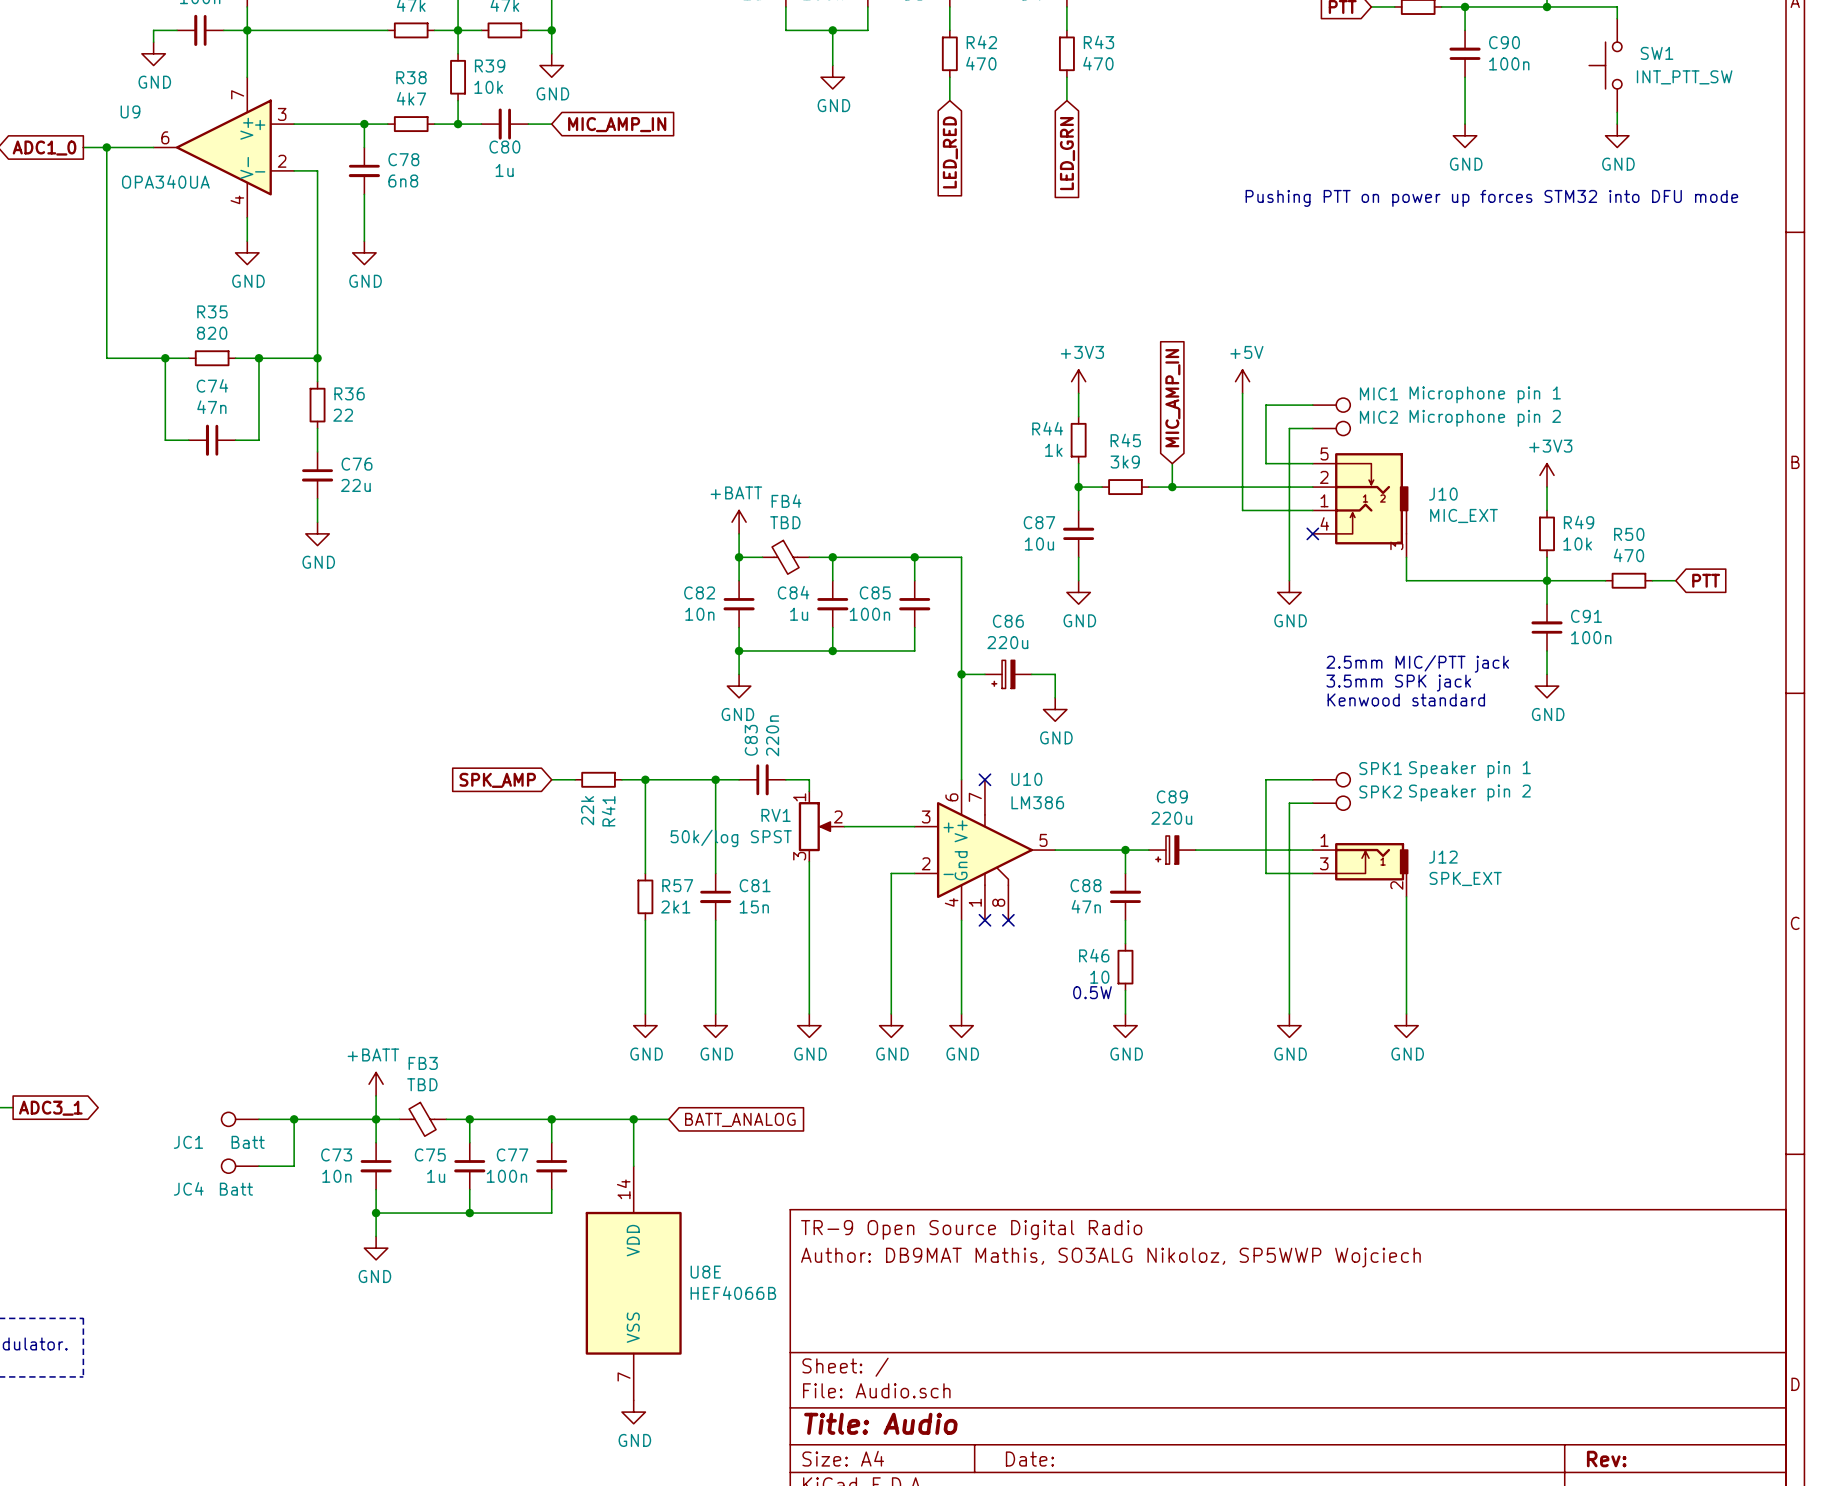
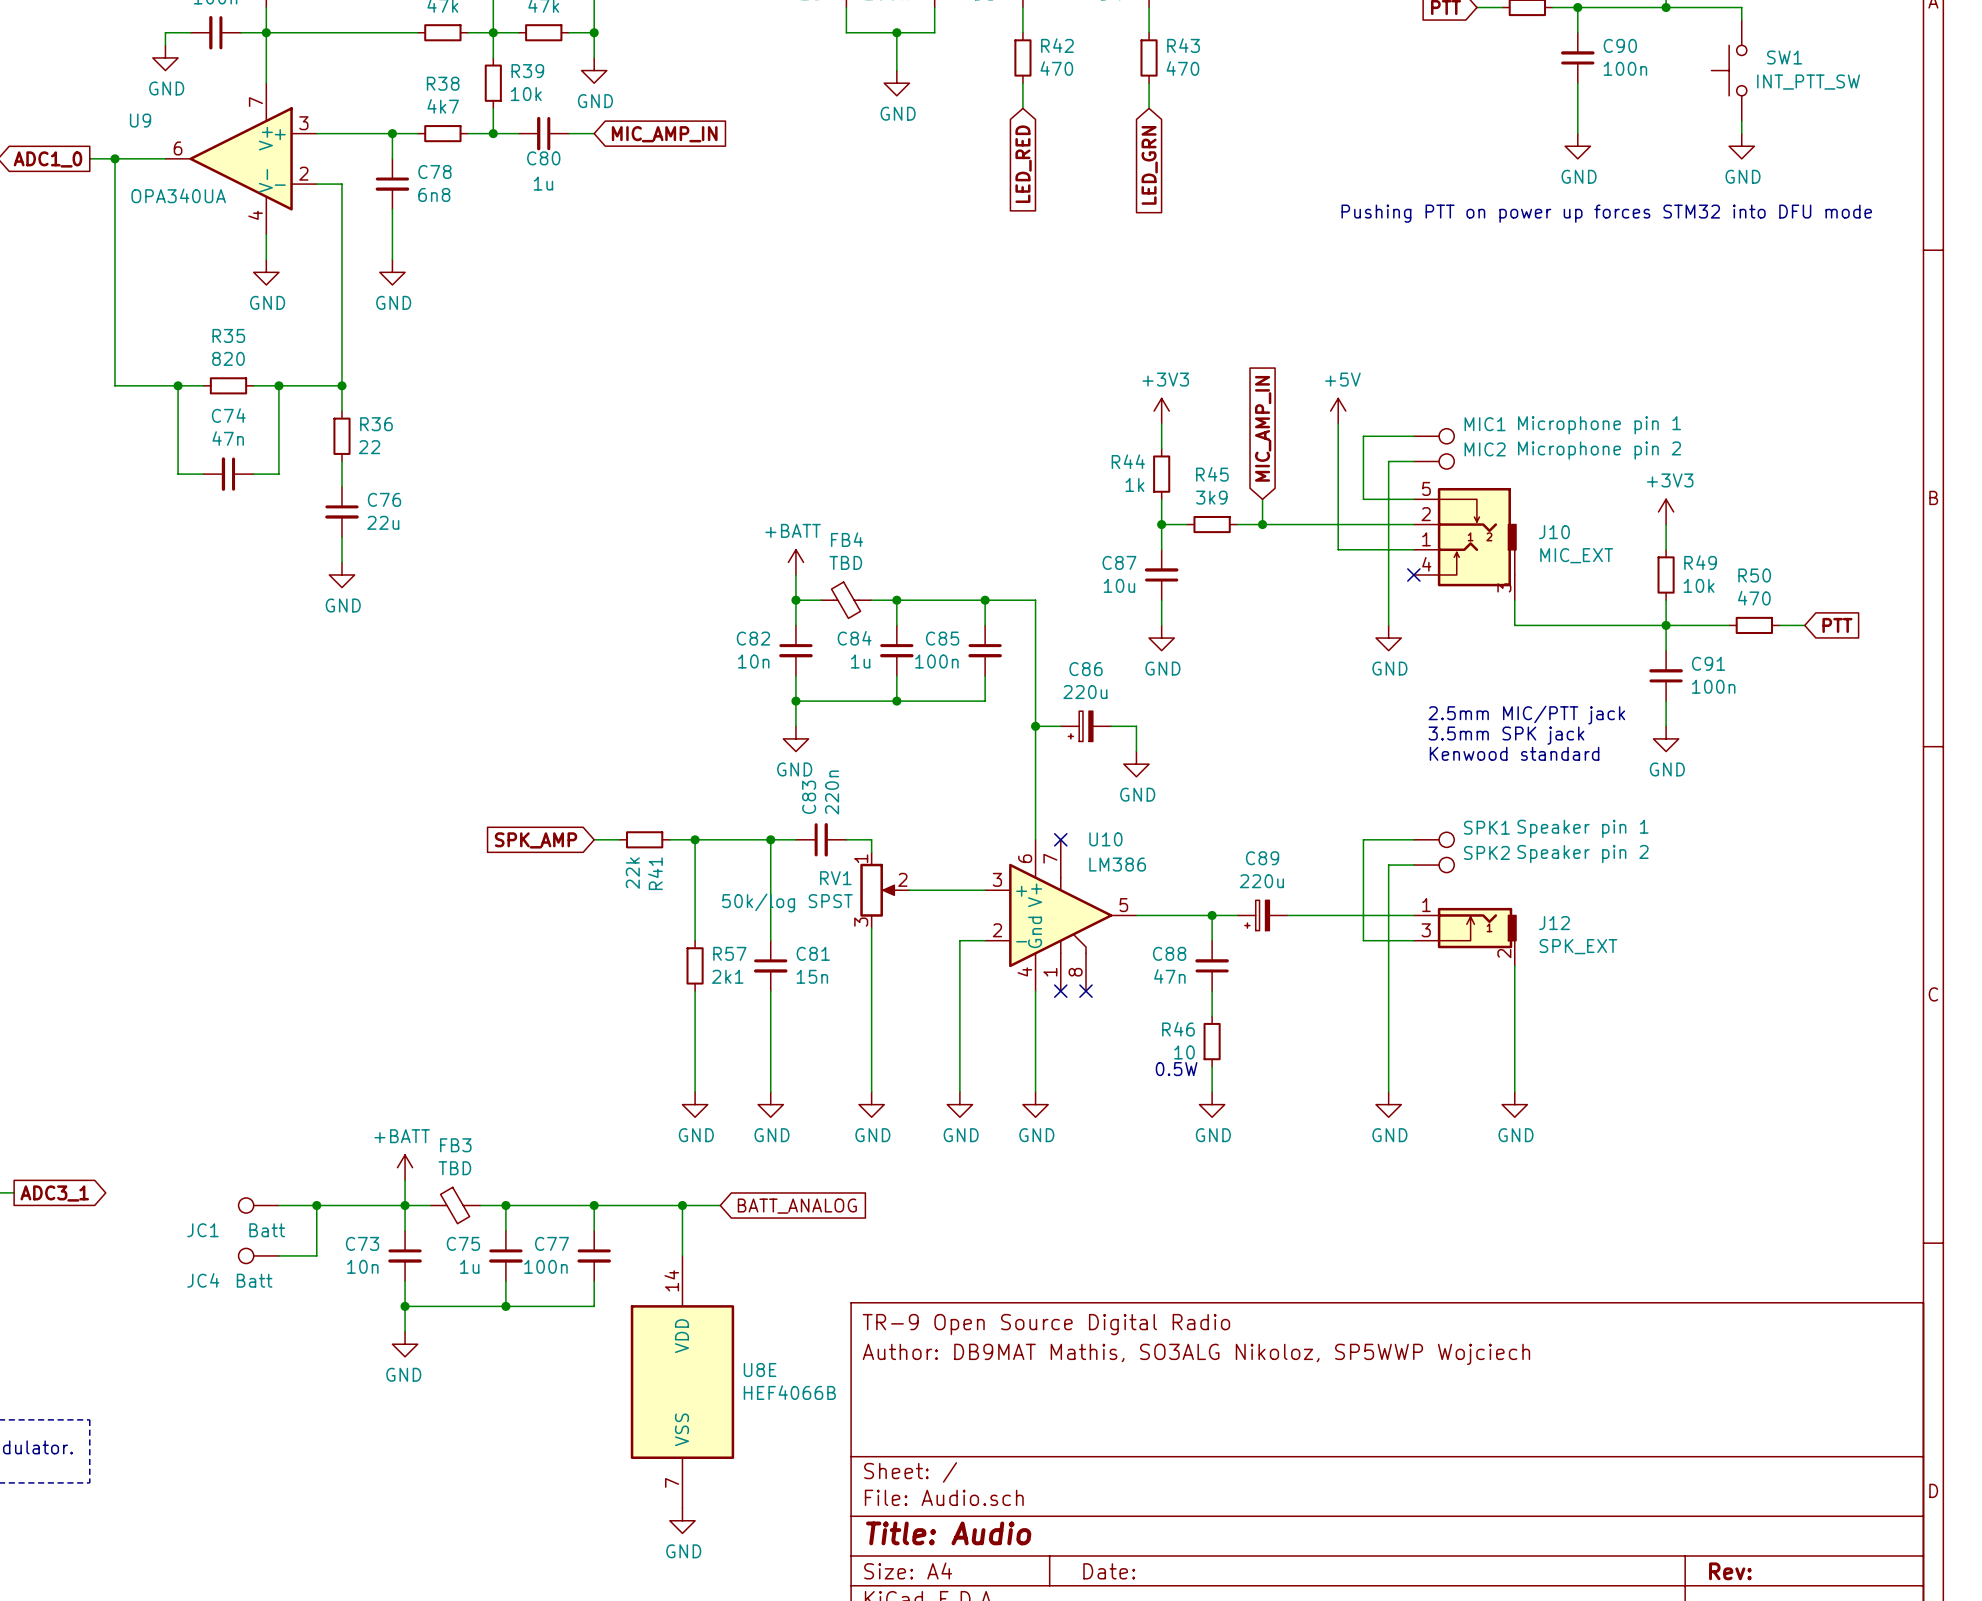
SW1 value position: INT_PTT_SW (1684, 77) -> INT_PTT_SW (1808, 82)

